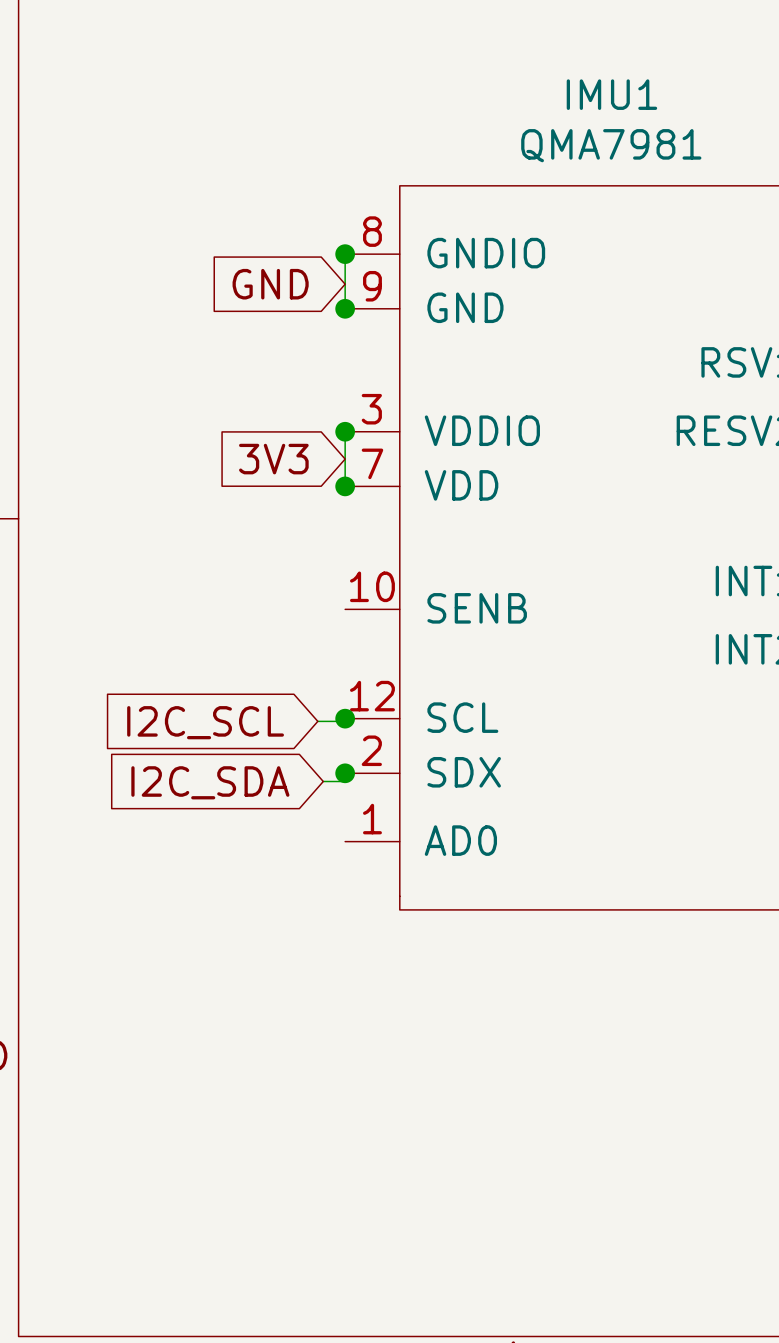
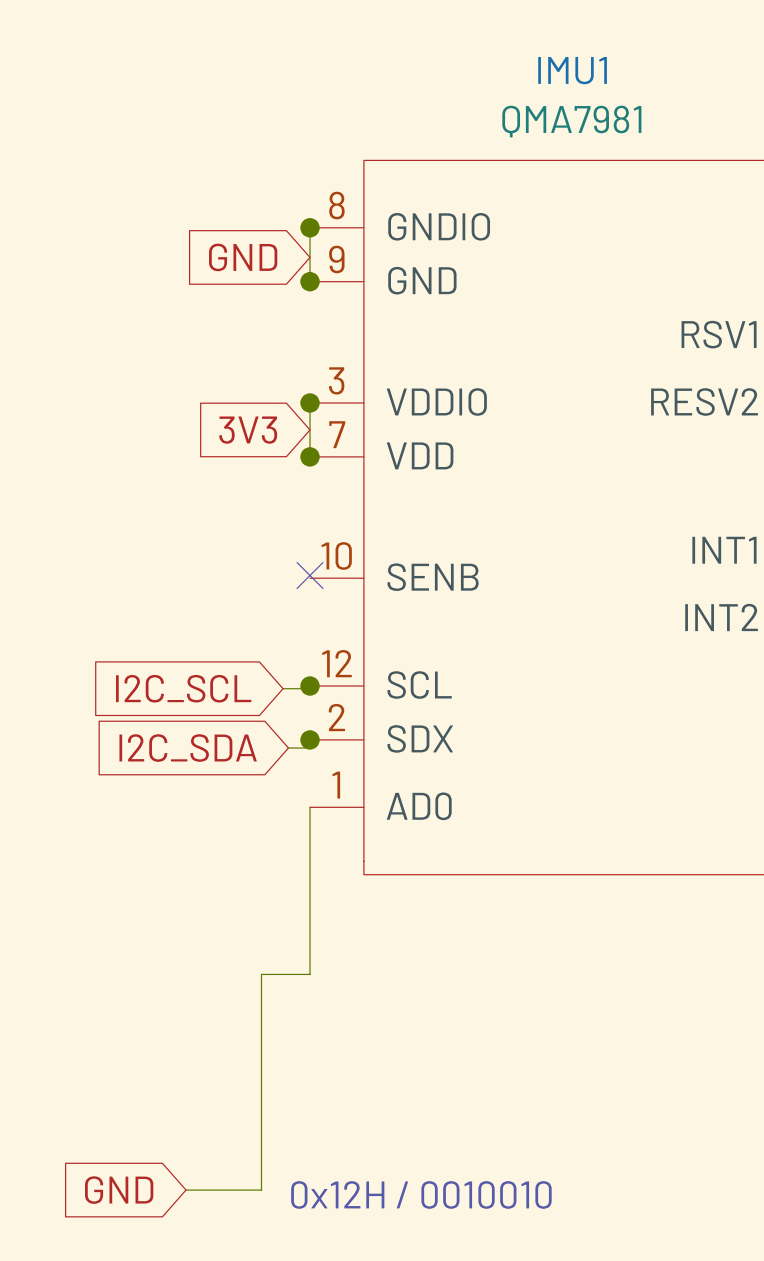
no-connect mark: none -> (310, 575)
wire: none -> (310, 807) (310, 974) (261, 974) (261, 1190) (186, 1190)
global label: none -> GND (119, 1190)
text: none -> 0x12H / 0010010 (421, 1194)

